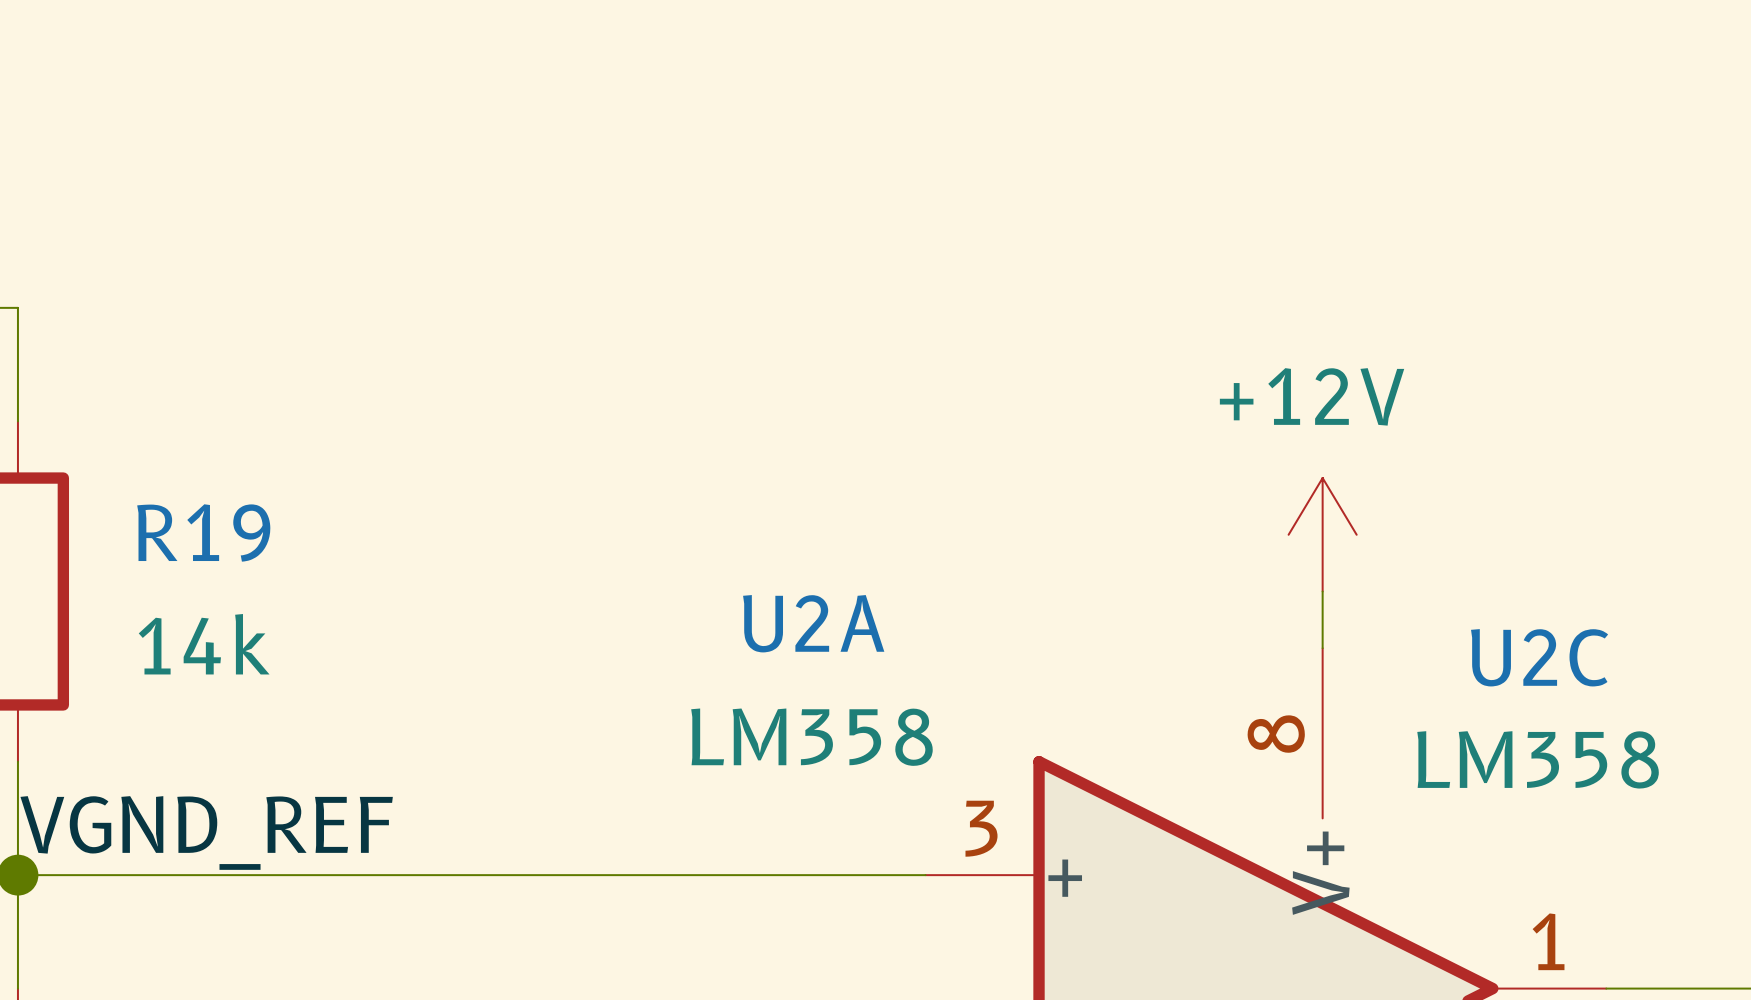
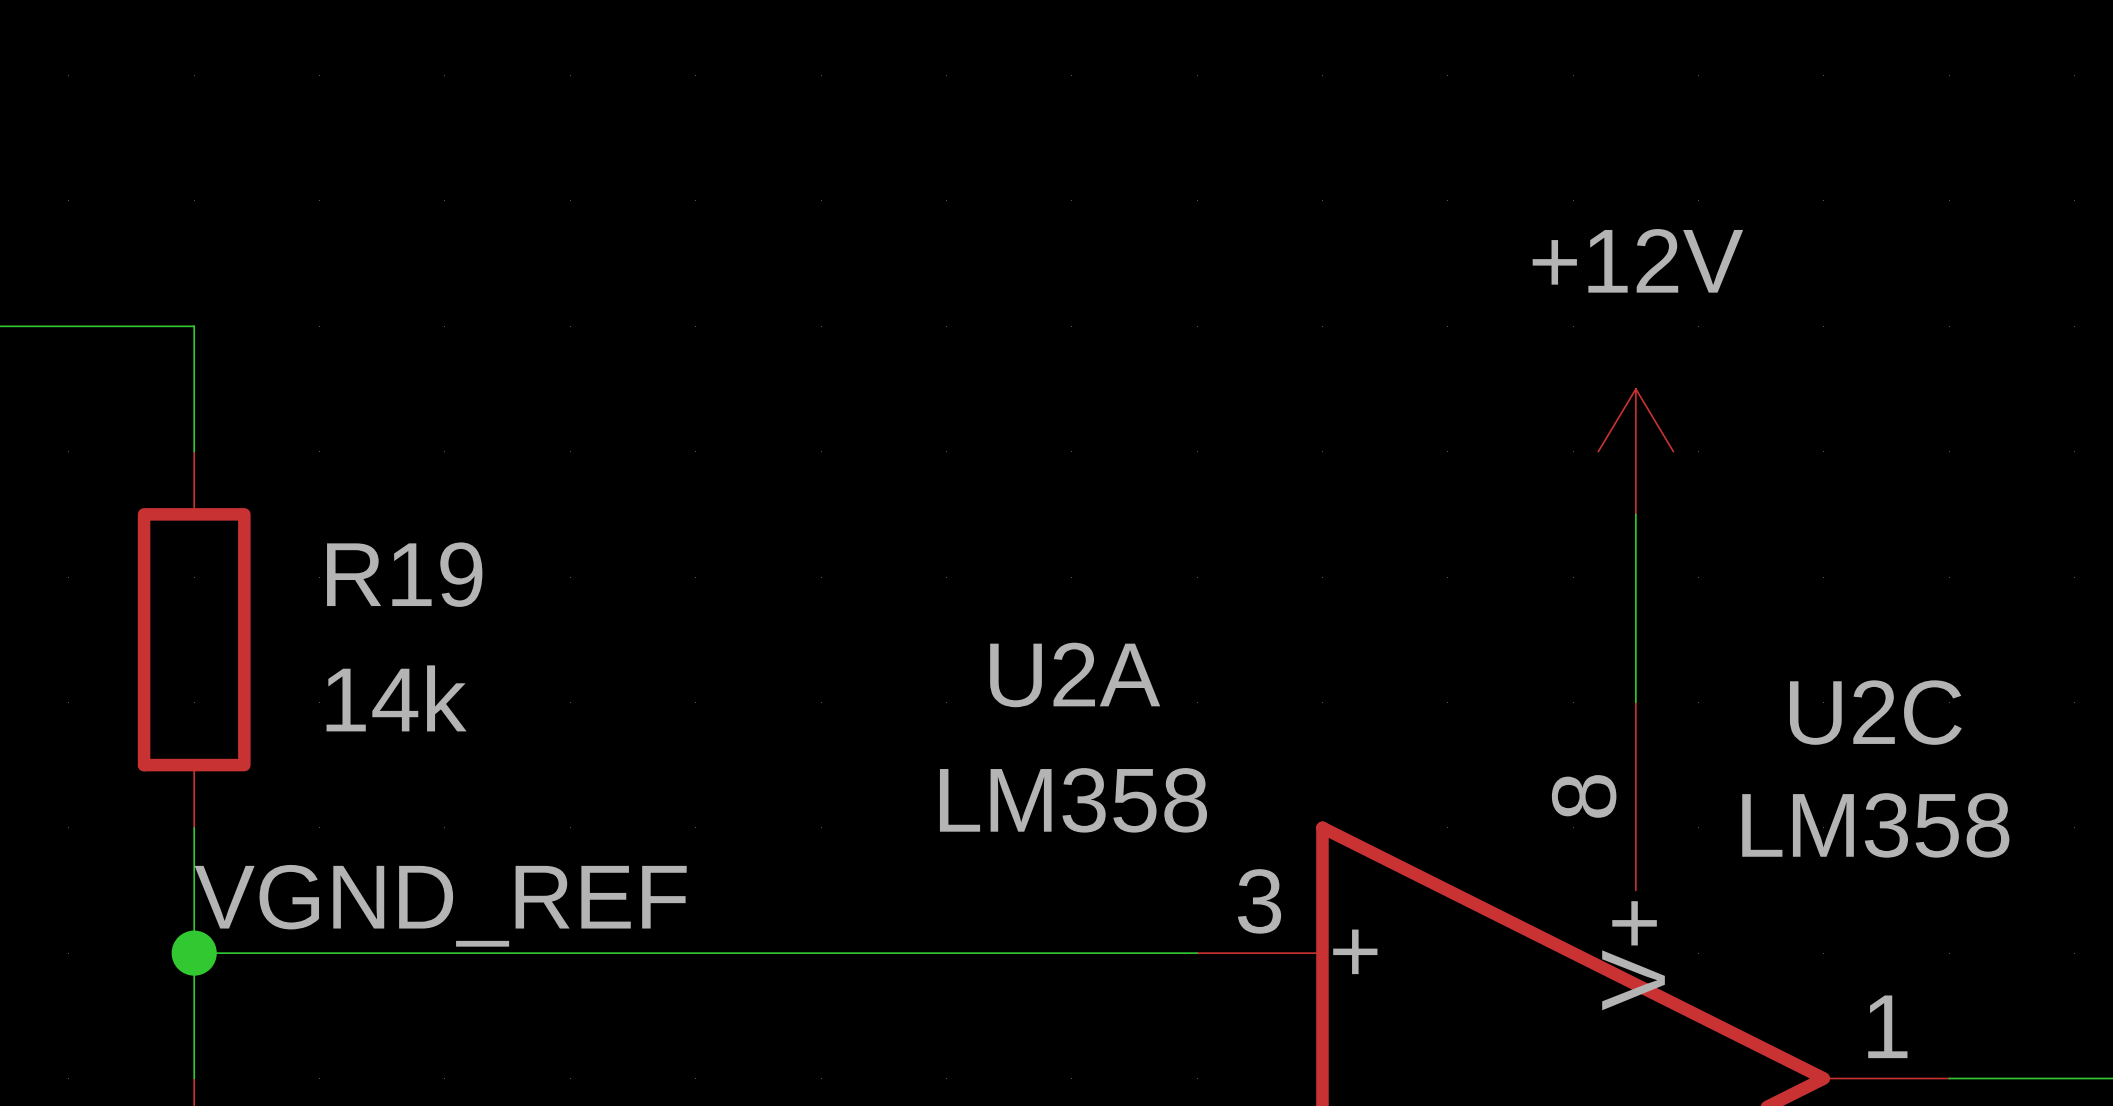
power symbol text position: +12V (1312, 396) -> +12V (1637, 260)
power symbol position: +12V (1322, 534) -> +12V (1635, 451)

